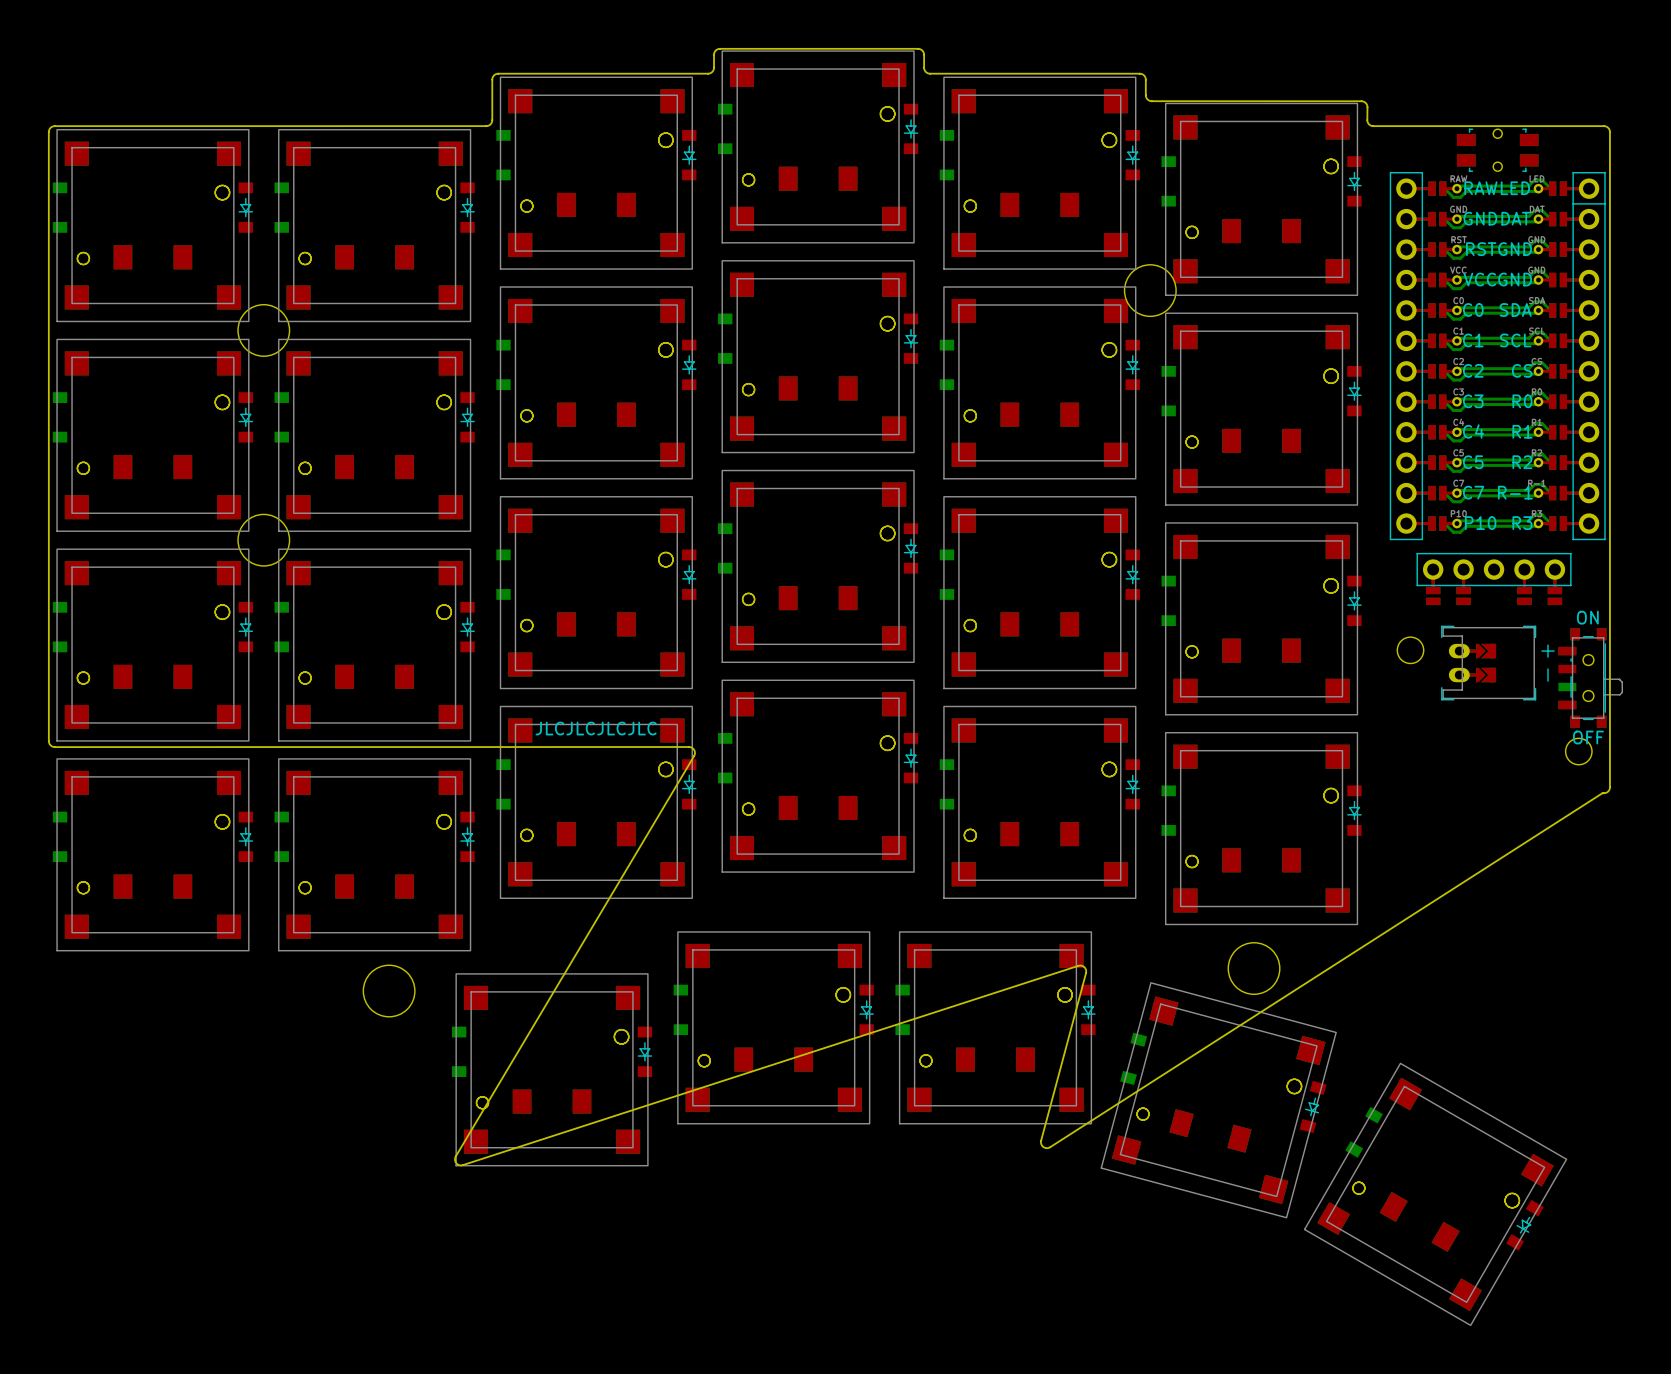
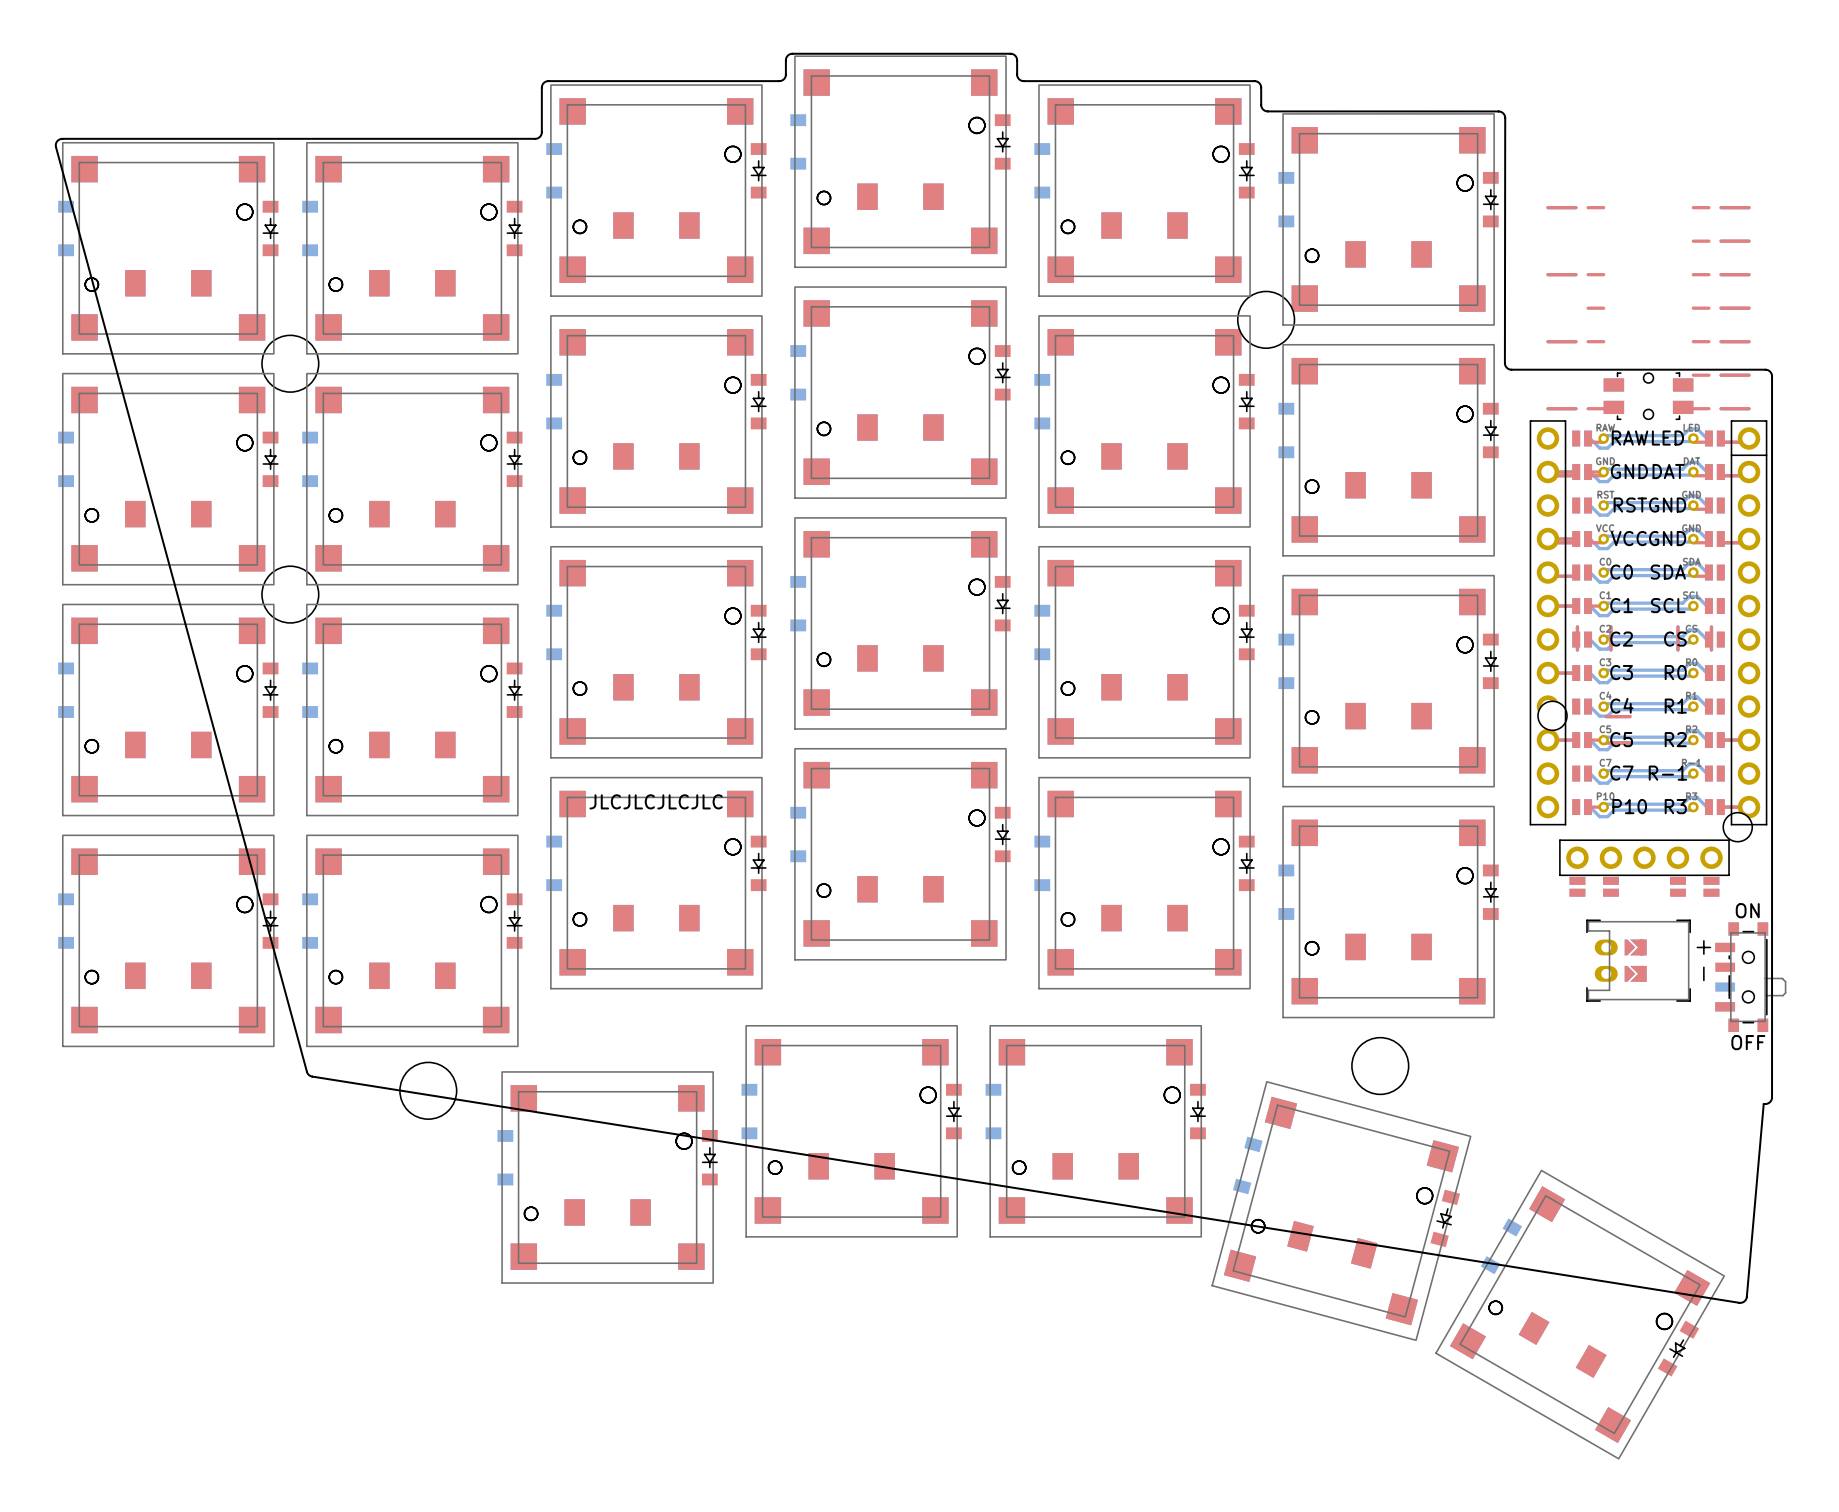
board edge: (1361, 101) (1366, 104) (1367, 121) (1372, 126) (1603, 126) (1608, 127) (1609, 132) (1609, 341) -> (1498, 111) (1503, 113) (1505, 118) (1504, 363) (1506, 367) (1511, 369) (1765, 369) (1770, 371) (1772, 376)
board edge: (56, 126) (51, 127) (48, 132) (48, 741) (50, 745) (54, 747) (689, 747) (694, 750) (694, 756) (455, 1156) (455, 1161) (458, 1164) (1081, 965) (1085, 968) (1086, 973) (1041, 1141) (1043, 1147) (1048, 1147) (1602, 793) (1607, 792) (1609, 787) -> (62, 138) (57, 141) (56, 147) (306, 1071) (310, 1076) (1741, 1302) (1746, 1296) (1763, 1103) (1768, 1102) (1771, 1098) (1772, 866)
part: (1497, 150) -> none
part footprint: [1389, 172, 1606, 541] -> [1603, 372, 1694, 420]
bottom track: (1459, 186) (1528, 186) (1534, 179) (1542, 179) (1550, 188) (1554, 188) -> (1606, 435) (1682, 435) (1689, 428) (1697, 428) (1706, 438) (1711, 438)
bottom track: (1440, 188) (1444, 188) (1453, 197) (1460, 197) (1466, 191) (1535, 191) -> (1585, 438) (1590, 438) (1599, 448) (1607, 448) (1614, 441) (1690, 441)
bottom track: (1459, 216) (1528, 216) (1534, 210) (1542, 210) (1550, 219) (1554, 219) -> (1606, 469) (1682, 469) (1689, 462) (1697, 462) (1706, 472) (1711, 472)
top track: (1406, 219) (1431, 219) -> (1547, 472) (1575, 472)
bottom track: (1440, 219) (1444, 219) (1453, 227) (1460, 227) (1466, 221) (1535, 221) -> (1585, 472) (1590, 472) (1599, 481) (1607, 481) (1614, 475) (1690, 475)
top track: (1442, 219) (1456, 219) -> (1588, 472) (1603, 472)
bottom track: (1459, 246) (1528, 246) (1534, 240) (1542, 240) (1550, 249) (1554, 249) -> (1606, 502) (1682, 502) (1689, 495) (1697, 495) (1706, 505) (1711, 505)
bottom track: (1440, 249) (1444, 249) (1453, 258) (1460, 258) (1466, 252) (1535, 252) -> (1585, 505) (1590, 505) (1599, 515) (1607, 515) (1614, 508) (1690, 508)
bottom track: (1459, 277) (1528, 277) (1534, 271) (1542, 271) (1550, 280) (1554, 280) -> (1606, 536) (1682, 536) (1689, 529) (1697, 529) (1706, 539) (1711, 539)
top track: (1406, 280) (1431, 280) -> (1547, 539) (1575, 539)
bottom track: (1440, 280) (1444, 280) (1453, 288) (1460, 288) (1466, 282) (1535, 282) -> (1585, 539) (1590, 539) (1599, 548) (1607, 548) (1614, 542) (1690, 542)
bottom track: (1459, 307) (1528, 307) (1534, 301) (1542, 301) (1550, 310) (1554, 310) -> (1606, 569) (1682, 569) (1689, 562) (1697, 562) (1706, 572) (1711, 572)
bottom track: (1440, 310) (1444, 310) (1453, 319) (1460, 319) (1466, 313) (1535, 313) -> (1585, 572) (1590, 572) (1599, 582) (1607, 582) (1614, 575) (1690, 575)
bottom track: (1459, 338) (1528, 338) (1534, 332) (1542, 332) (1550, 340) (1554, 340) -> (1606, 603) (1682, 603) (1689, 596) (1697, 596) (1706, 606) (1711, 606)
top track: (1406, 340) (1431, 340) -> (1547, 606) (1575, 606)
bottom track: (1440, 340) (1444, 340) (1453, 349) (1460, 349) (1466, 343) (1535, 343) -> (1585, 606) (1590, 606) (1599, 615) (1607, 615) (1614, 609) (1690, 609)
top track: (1442, 340) (1456, 340) -> (1588, 606) (1603, 606)
bottom track: (1459, 368) (1528, 368) (1534, 362) (1542, 362) (1550, 371) (1554, 371) -> (1606, 636) (1682, 636) (1689, 630) (1697, 630) (1706, 639) (1711, 639)
bottom track: (1440, 371) (1444, 371) (1453, 380) (1460, 380) (1466, 374) (1535, 374) -> (1585, 639) (1590, 639) (1599, 649) (1607, 649) (1614, 642) (1690, 642)
bottom track: (1459, 399) (1528, 399) (1534, 393) (1542, 393) (1550, 401) (1554, 401) -> (1606, 670) (1682, 670) (1689, 663) (1697, 663) (1706, 673) (1711, 673)
top track: (1406, 401) (1431, 401) -> (1547, 673) (1575, 673)
bottom track: (1440, 401) (1444, 401) (1453, 410) (1460, 410) (1466, 404) (1535, 404) -> (1585, 673) (1590, 673) (1599, 682) (1607, 682) (1614, 676) (1690, 676)
bottom track: (1459, 429) (1528, 429) (1534, 423) (1542, 423) (1550, 432) (1554, 432) -> (1606, 703) (1682, 703) (1689, 697) (1697, 697) (1706, 706) (1711, 706)
bottom track: (1440, 432) (1444, 432) (1453, 440) (1460, 440) (1466, 434) (1535, 434) -> (1585, 706) (1590, 706) (1599, 716) (1607, 716) (1614, 709) (1690, 709)
bottom track: (1459, 460) (1528, 460) (1534, 453) (1542, 453) (1550, 462) (1554, 462) -> (1606, 737) (1682, 737) (1689, 730) (1697, 730) (1706, 740) (1711, 740)
top track: (1406, 462) (1431, 462) -> (1547, 740) (1575, 740)
bottom track: (1440, 462) (1444, 462) (1453, 471) (1460, 471) (1466, 465) (1535, 465) -> (1585, 740) (1590, 740) (1599, 749) (1607, 749) (1614, 743) (1690, 743)
top track: (1442, 462) (1456, 462) -> (1588, 740) (1603, 740)
top track: (1563, 462) (1589, 462) -> (1721, 740) (1749, 740)
bottom track: (1459, 490) (1528, 490) (1534, 484) (1542, 484) (1550, 493) (1554, 493) -> (1606, 770) (1682, 770) (1689, 764) (1697, 764) (1706, 773) (1711, 773)
bottom track: (1440, 493) (1444, 493) (1453, 501) (1460, 501) (1466, 495) (1535, 495) -> (1585, 773) (1590, 773) (1599, 783) (1607, 783) (1614, 776) (1690, 776)
bottom track: (1459, 520) (1528, 520) (1534, 514) (1542, 514) (1550, 523) (1554, 523) -> (1606, 804) (1682, 804) (1689, 797) (1697, 797) (1706, 807) (1711, 807)
bottom track: (1440, 523) (1444, 523) (1453, 532) (1460, 532) (1466, 526) (1535, 526) -> (1585, 807) (1590, 807) (1599, 816) (1607, 816) (1614, 810) (1690, 810)
top track: (1442, 523) (1456, 523) -> (1588, 807) (1603, 807)
top track: (1563, 523) (1589, 523) -> (1721, 807) (1749, 807)
part: none -> (1648, 622)
part position: (1494, 578) -> (1644, 868)
part position: (1497, 663) -> (1648, 960)
part position: (1590, 678) -> (1750, 977)

